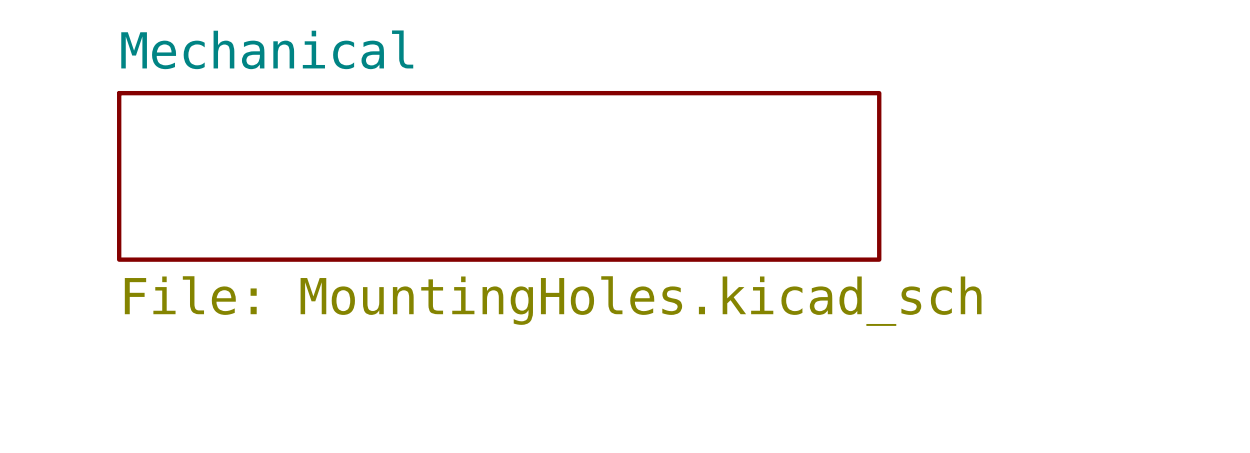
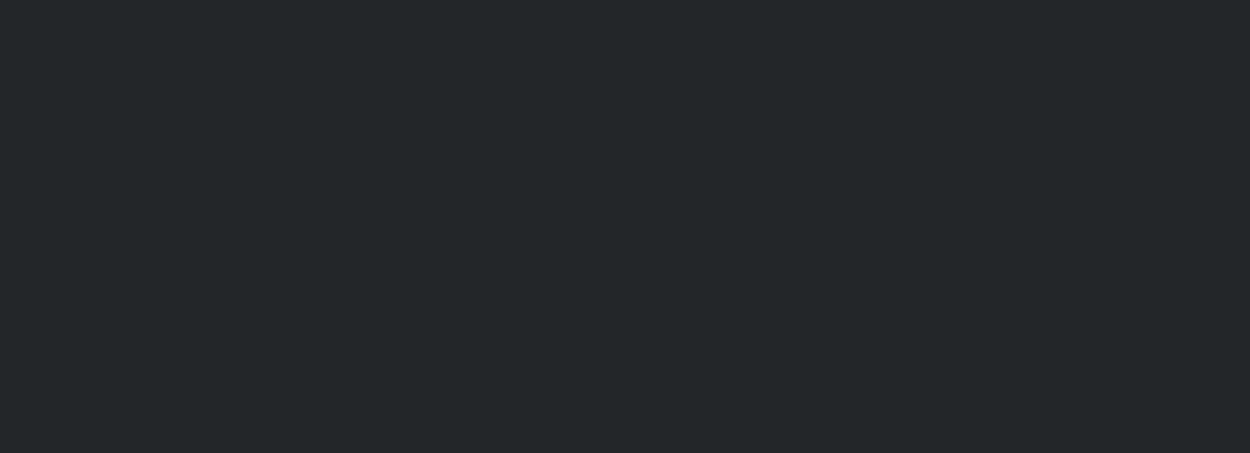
sheet Mechanical: File: MountingHoles.kicad_sch (499, 176) -> none

